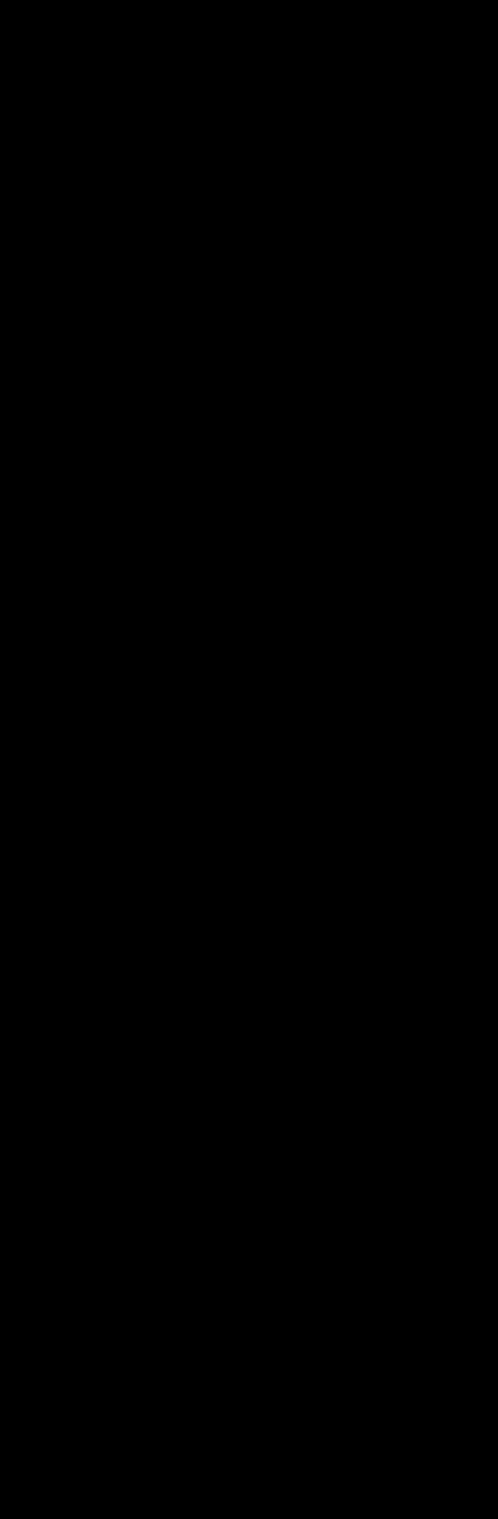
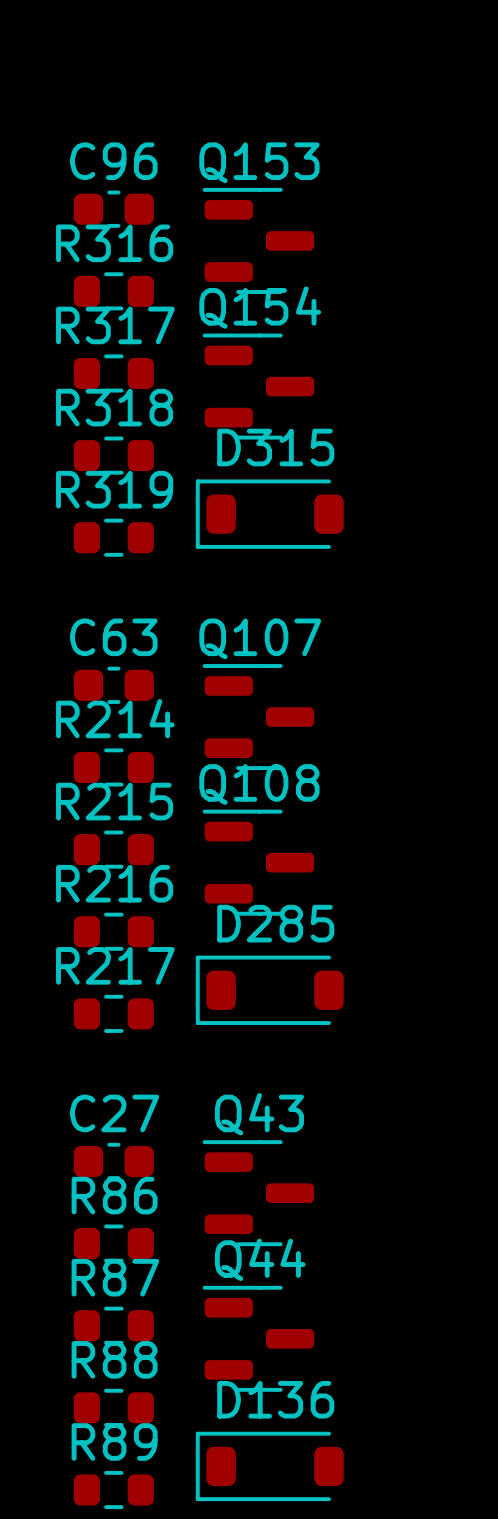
C96: none -> (113, 209)
Q153: none -> (258, 240)
R316: none -> (113, 291)
R317: none -> (113, 373)
Q154: none -> (258, 386)
R318: none -> (113, 455)
D315: none -> (269, 514)
R319: none -> (113, 537)
C63: none -> (113, 685)
Q107: none -> (258, 717)
R214: none -> (113, 767)
R215: none -> (113, 849)
Q108: none -> (258, 862)
R216: none -> (113, 931)
D285: none -> (269, 990)
R217: none -> (113, 1013)
C27: none -> (113, 1161)
Q43: none -> (258, 1193)
R86: none -> (113, 1243)
R87: none -> (113, 1325)
Q44: none -> (258, 1338)
R88: none -> (113, 1407)
D136: none -> (269, 1466)
R89: none -> (113, 1490)

